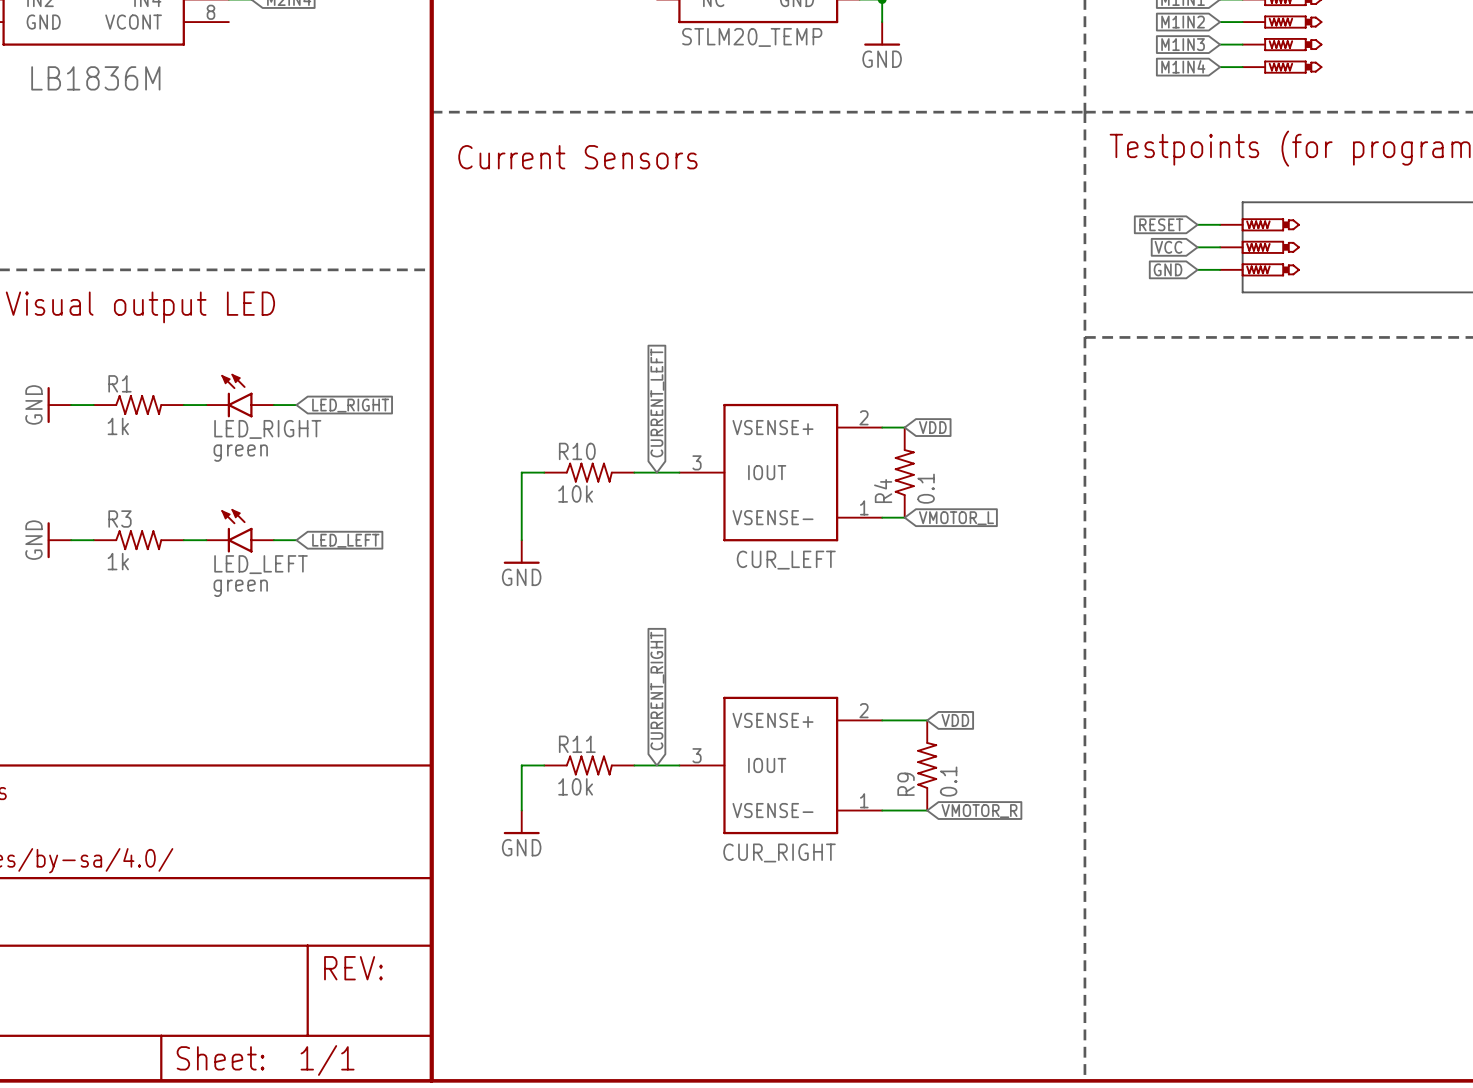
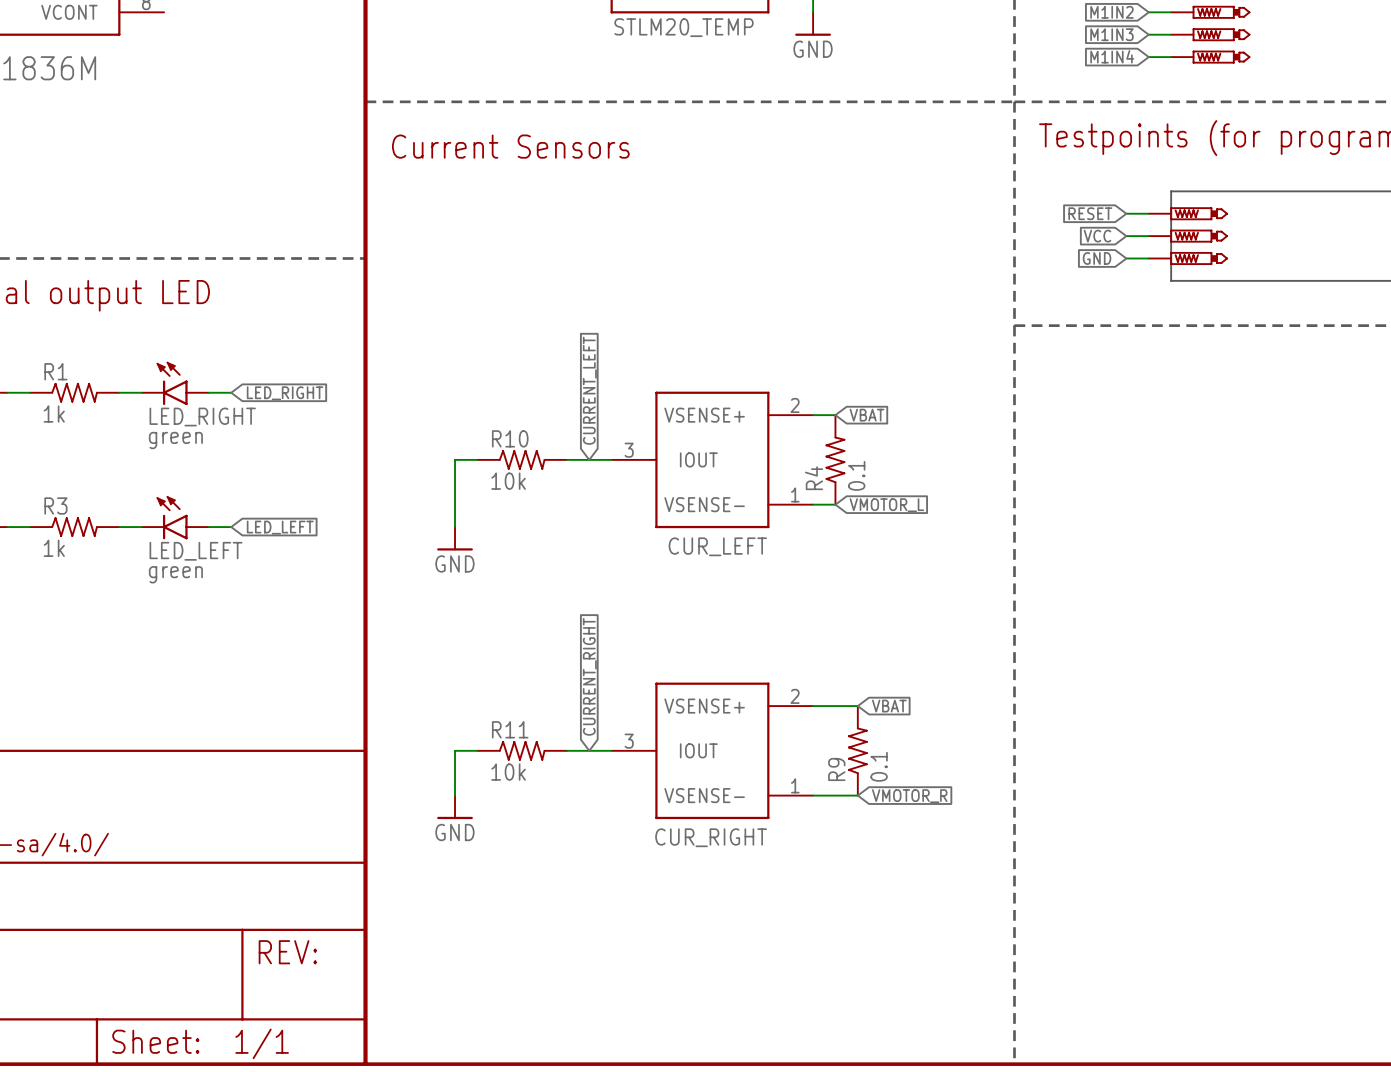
global label: VDD (932, 427) -> VBAT (866, 415)
global label: VDD (955, 720) -> VBAT (889, 706)

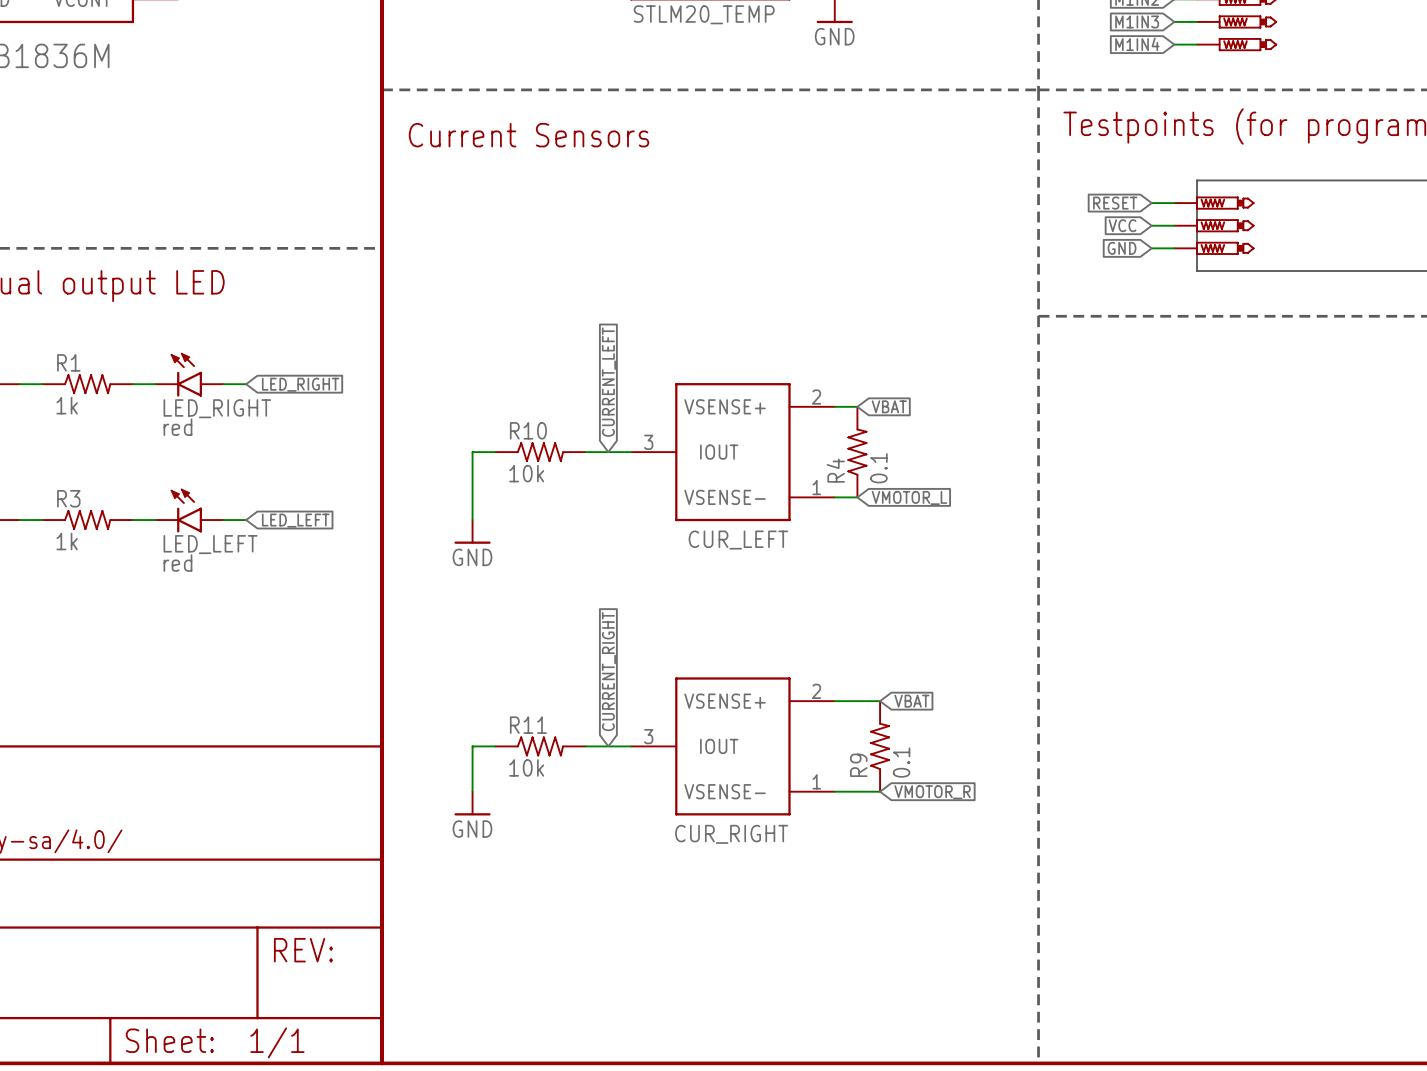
LED_RIGHT value: green (175, 440) -> red (177, 427)
LED_LEFT value: green (175, 574) -> red (177, 563)

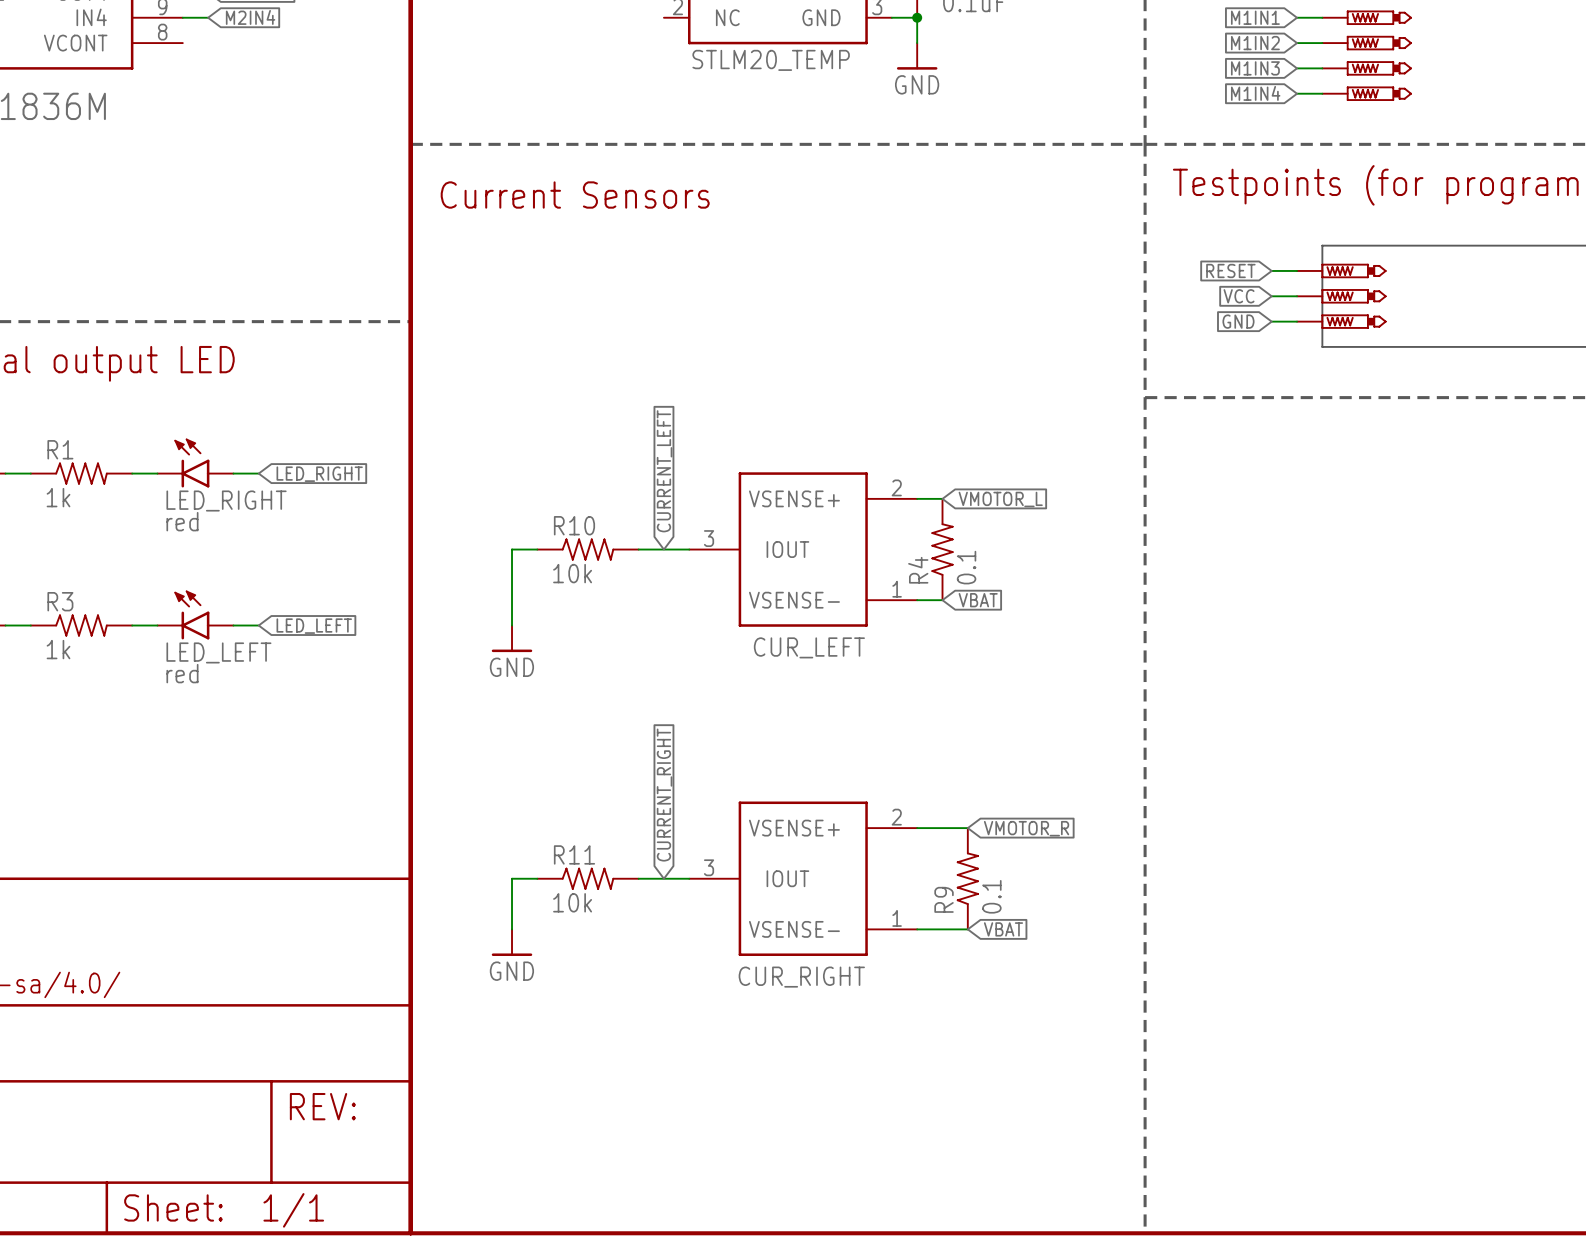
global label: VBAT (889, 406) -> VMOTOR_L (1000, 499)
global label: VMOTOR_L (909, 497) -> VBAT (978, 600)
global label: VBAT (911, 701) -> VMOTOR_R (1026, 828)
global label: VMOTOR_R (932, 792) -> VBAT (1003, 929)

